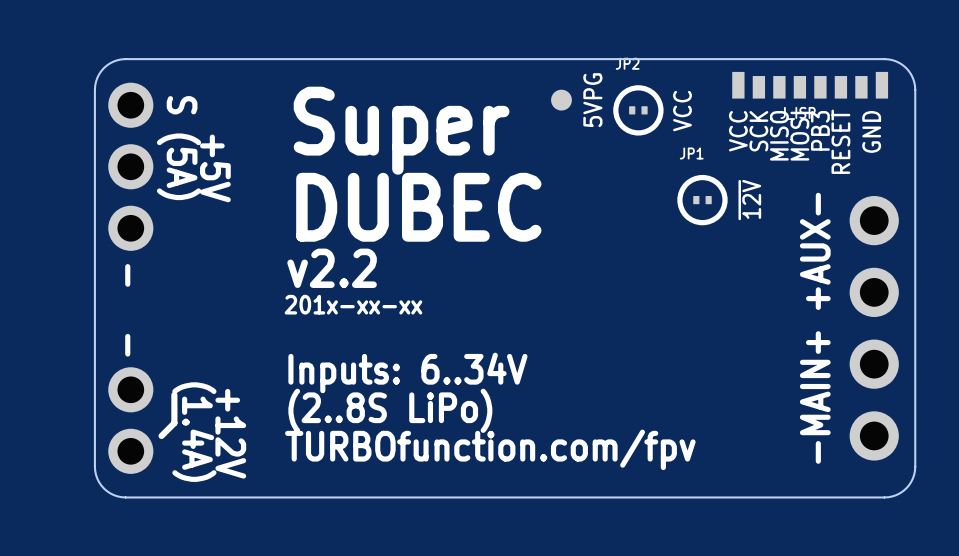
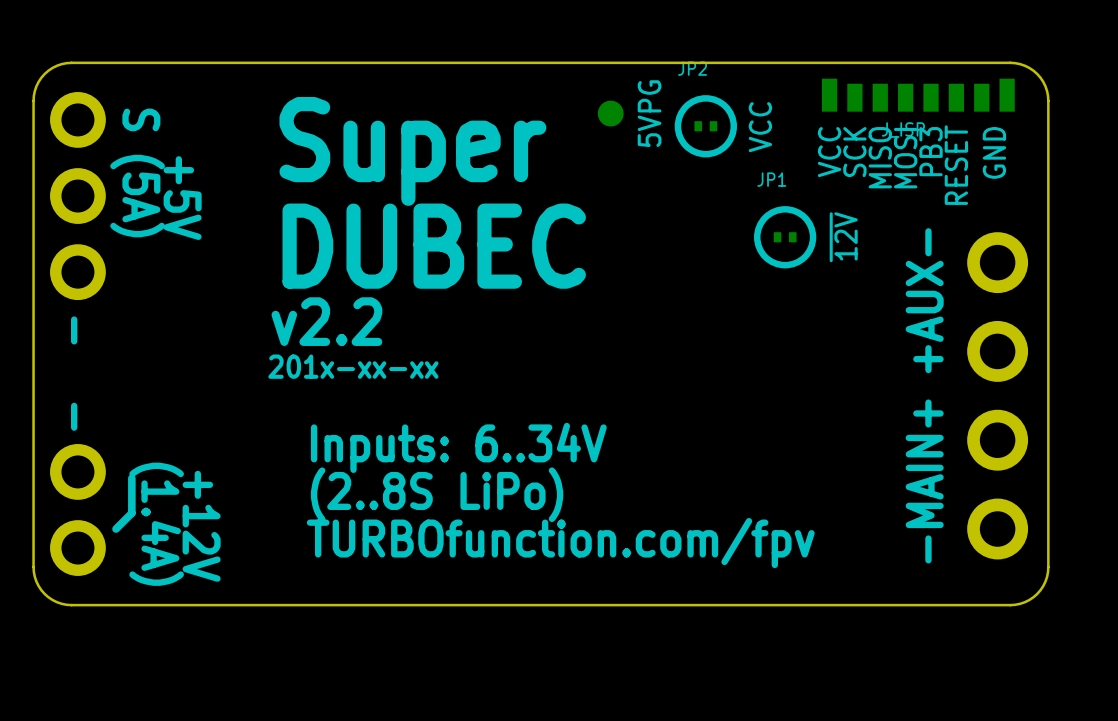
text position: Inputs: 6..34V (407, 372) -> Inputs: 6..34V (458, 447)
text position: (2..8S LiPo) (390, 410) -> (2..8S LiPo) (437, 494)
text position: TURBOfunction.com/fpv (490, 449) -> TURBOfunction.com/fpv (560, 543)

